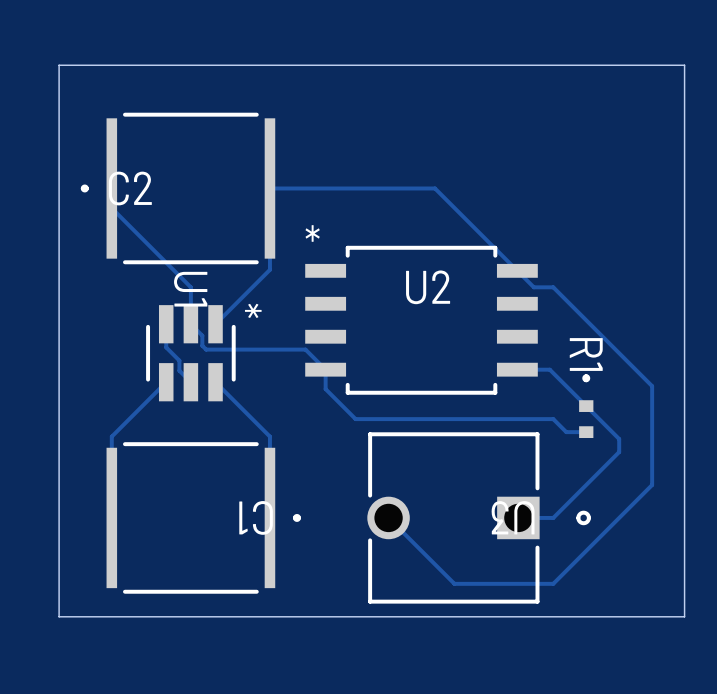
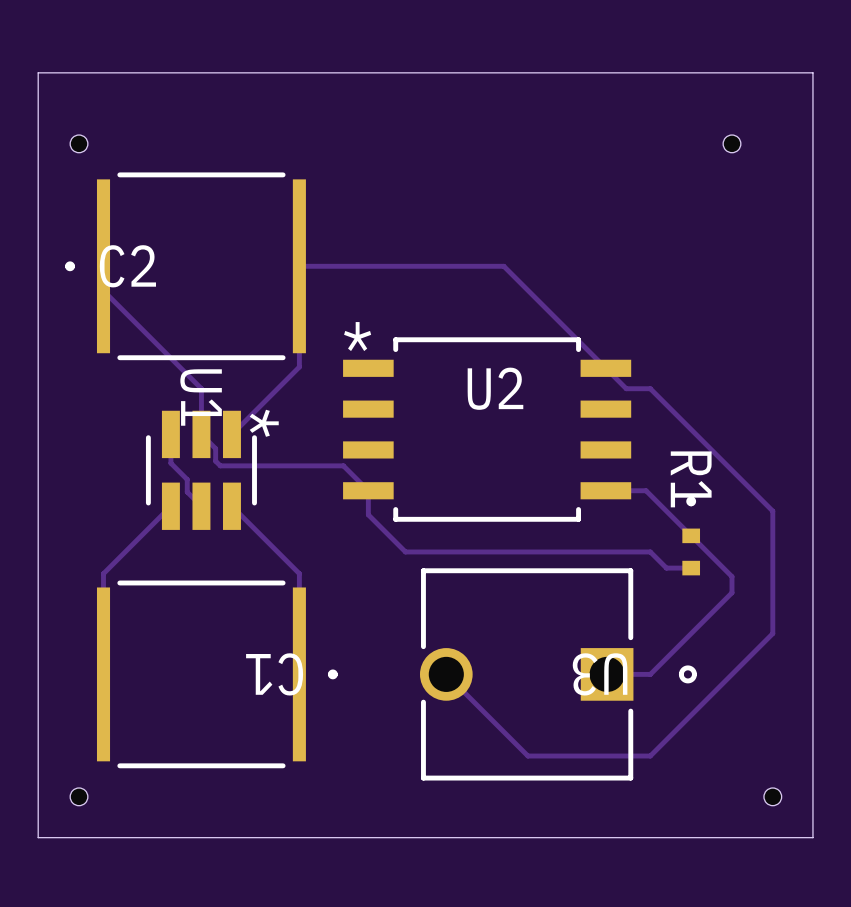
board edge: (59, 65) (684, 65) -> (38, 113) (38, 72) (812, 72) (812, 113)
hole: none -> (79, 143)
hole: none -> (731, 143)
board edge: (59, 616) (684, 616) -> (38, 796) (38, 837) (812, 837) (812, 796)
hole: none -> (79, 796)
hole: none -> (772, 796)

